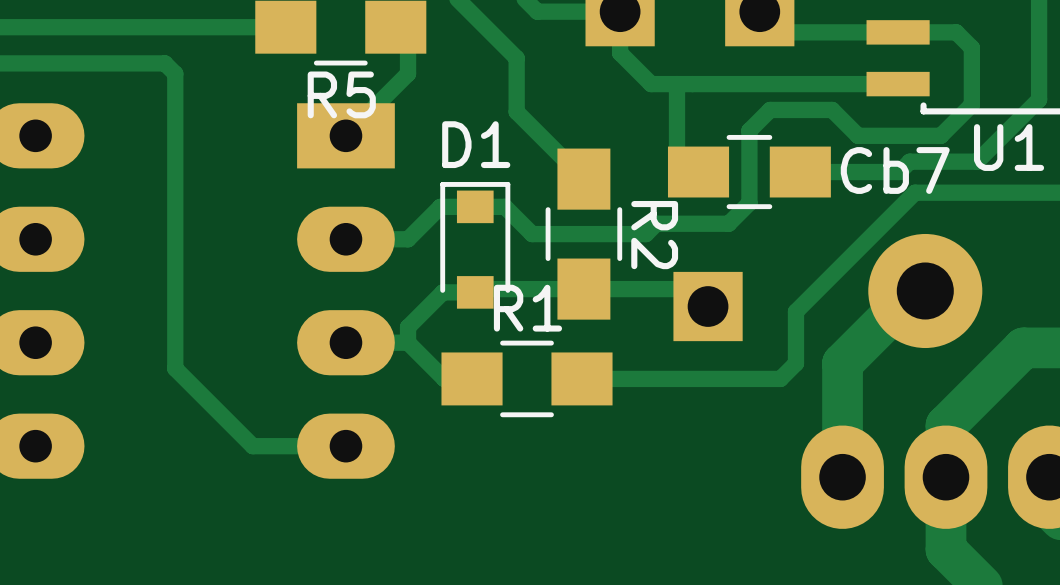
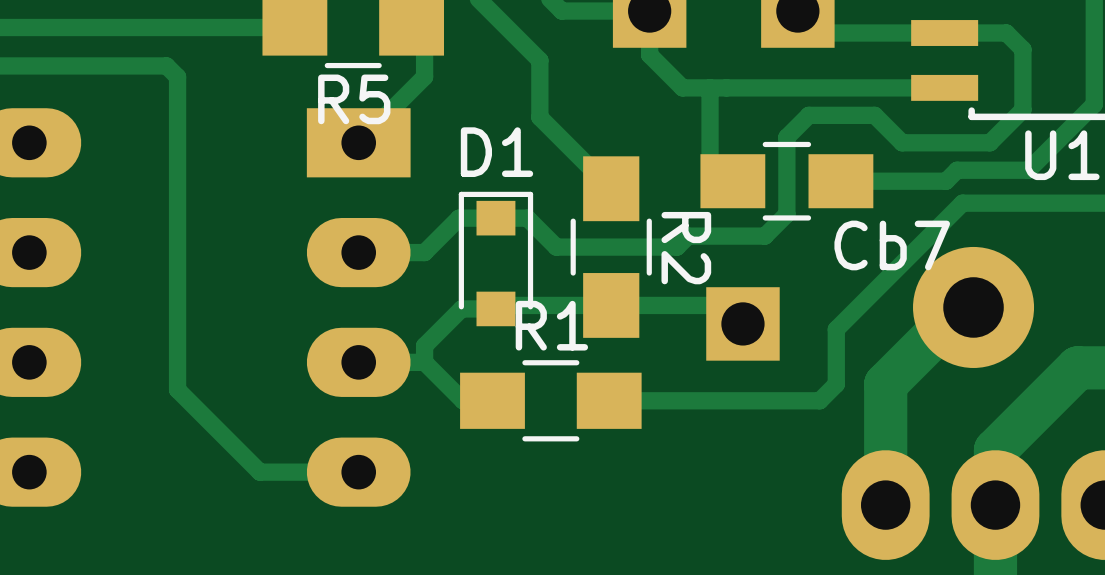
Cb7 name position: Cb7 (895, 170) -> Cb7 (892, 245)

